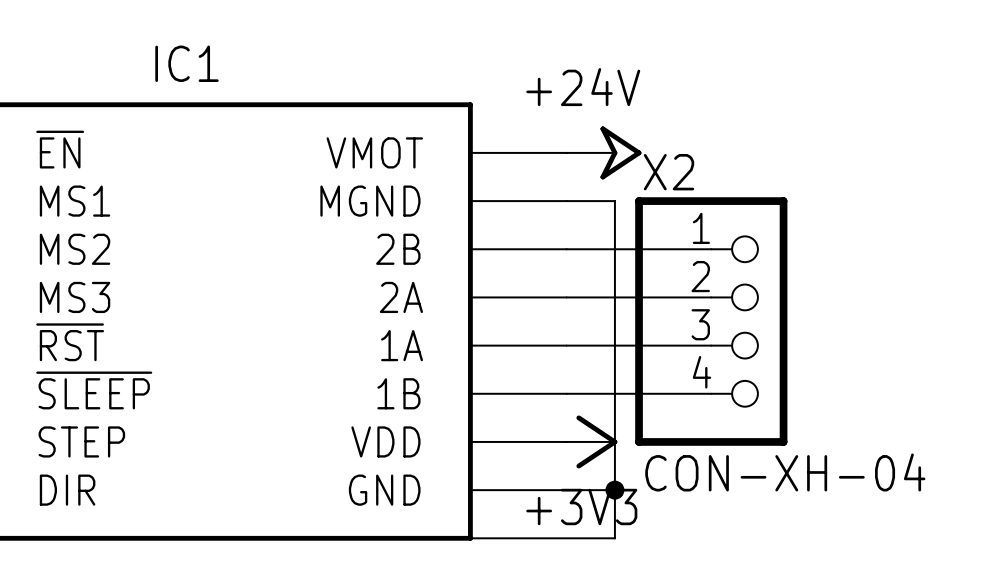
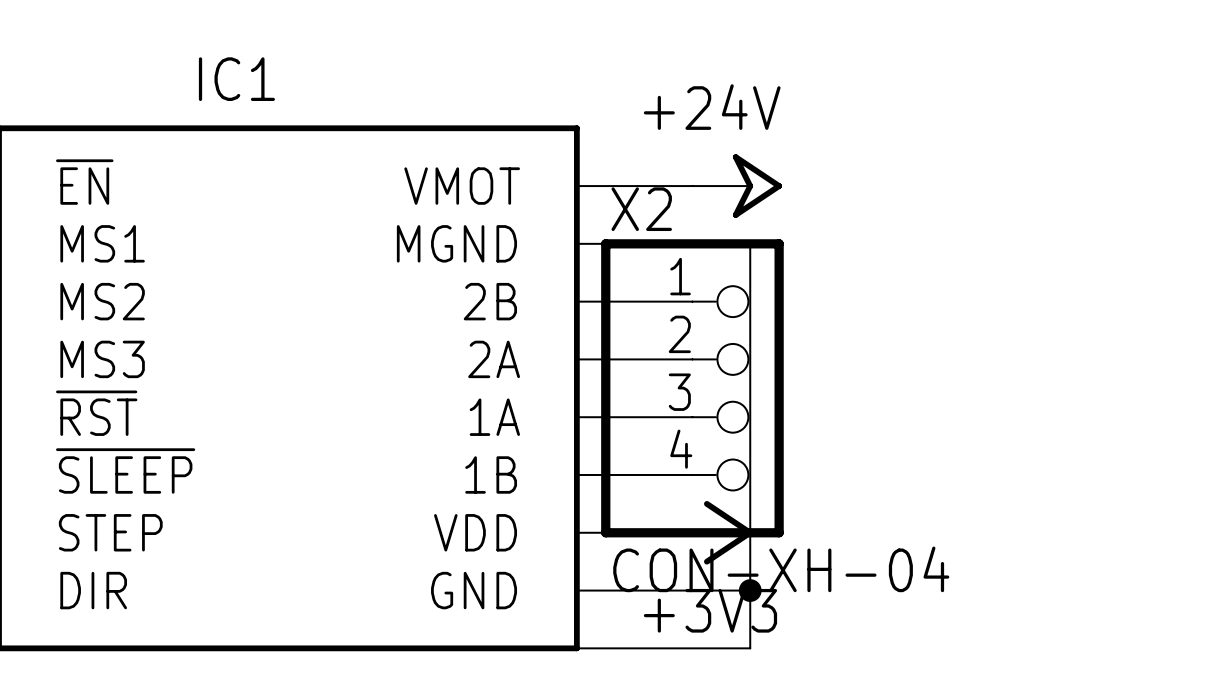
wire: (566, 249) (711, 249) -> none
wire: (566, 297) (711, 297) -> none
X2 position: (711, 321) -> (692, 388)
wire: (566, 345) (711, 345) -> none
wire: (566, 393) (711, 393) -> none

